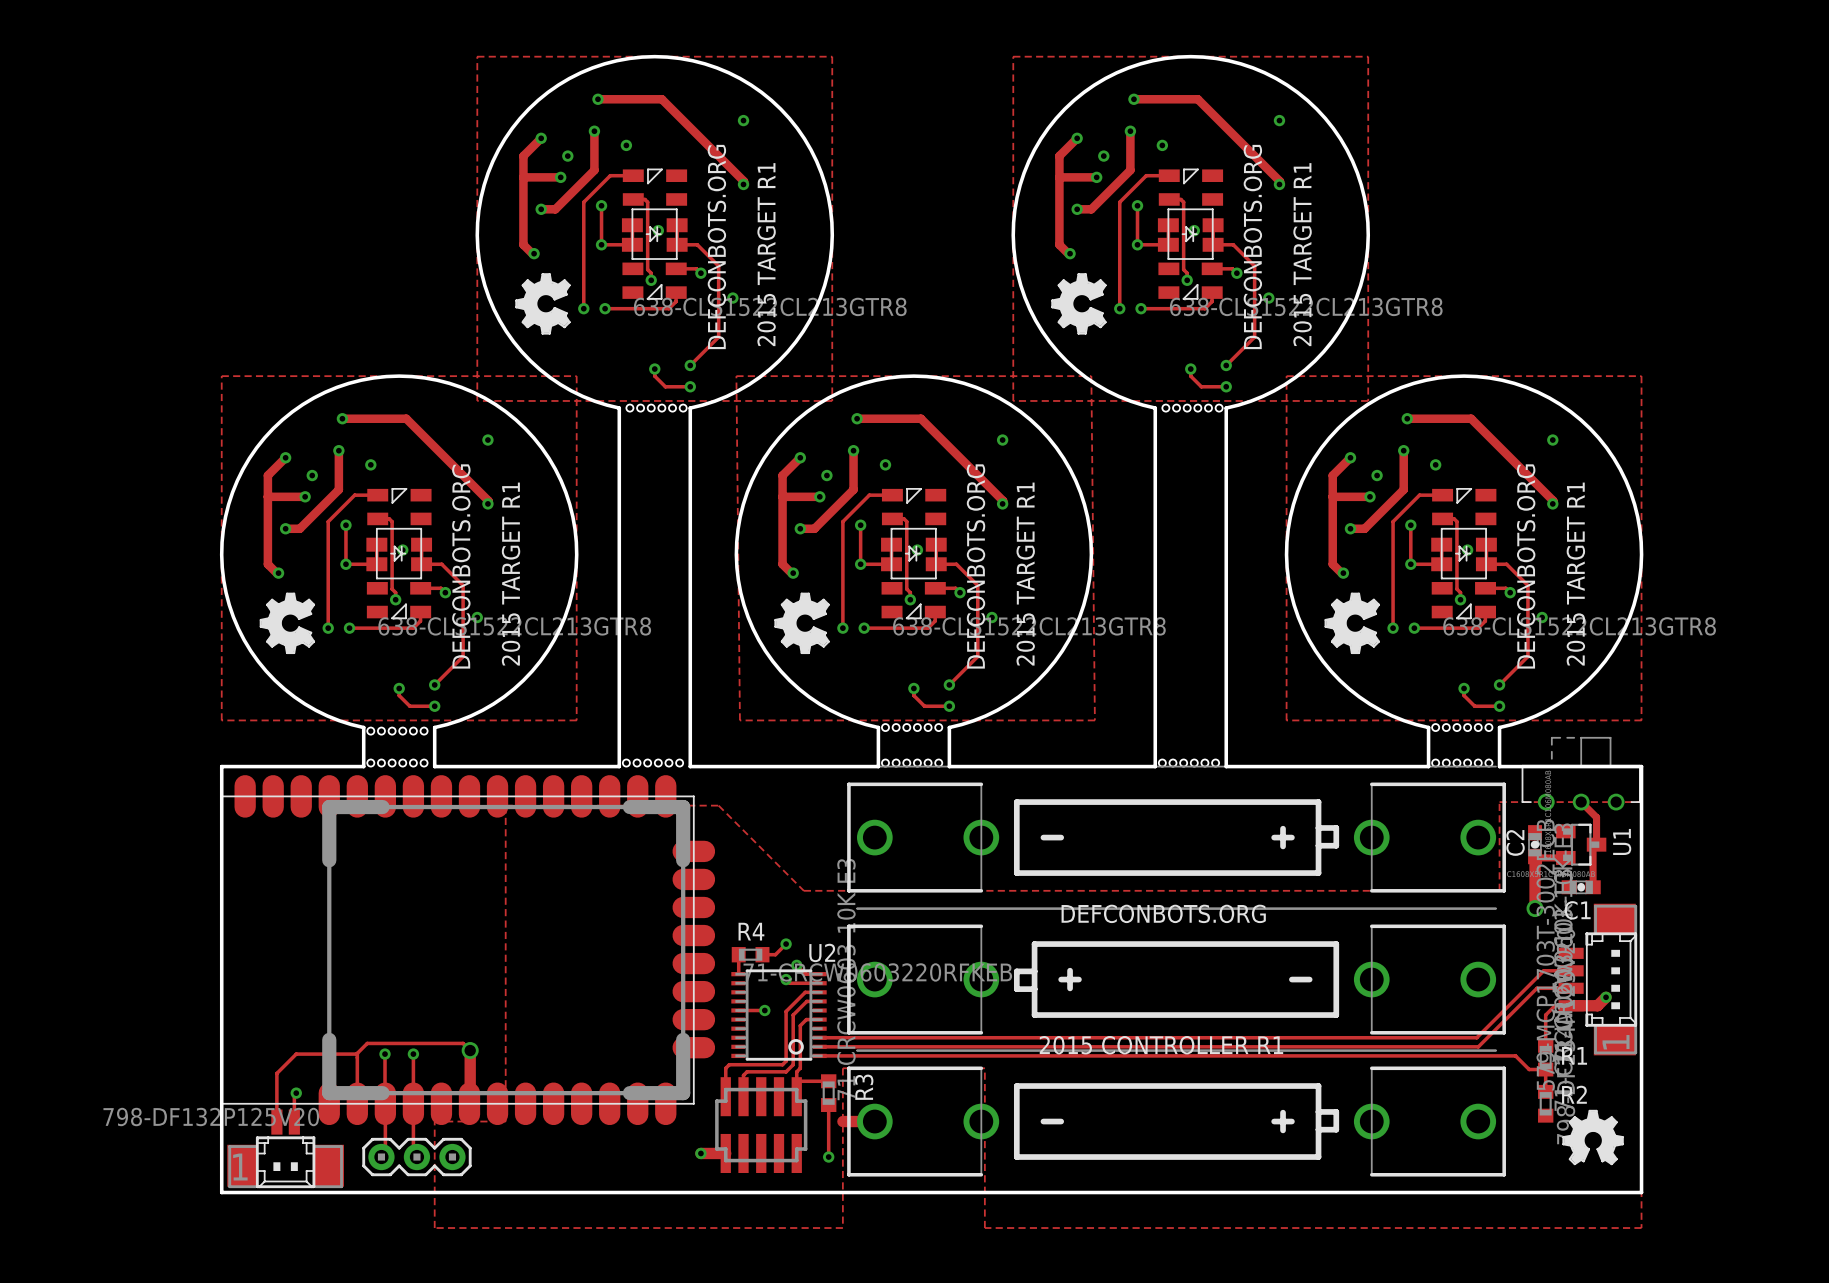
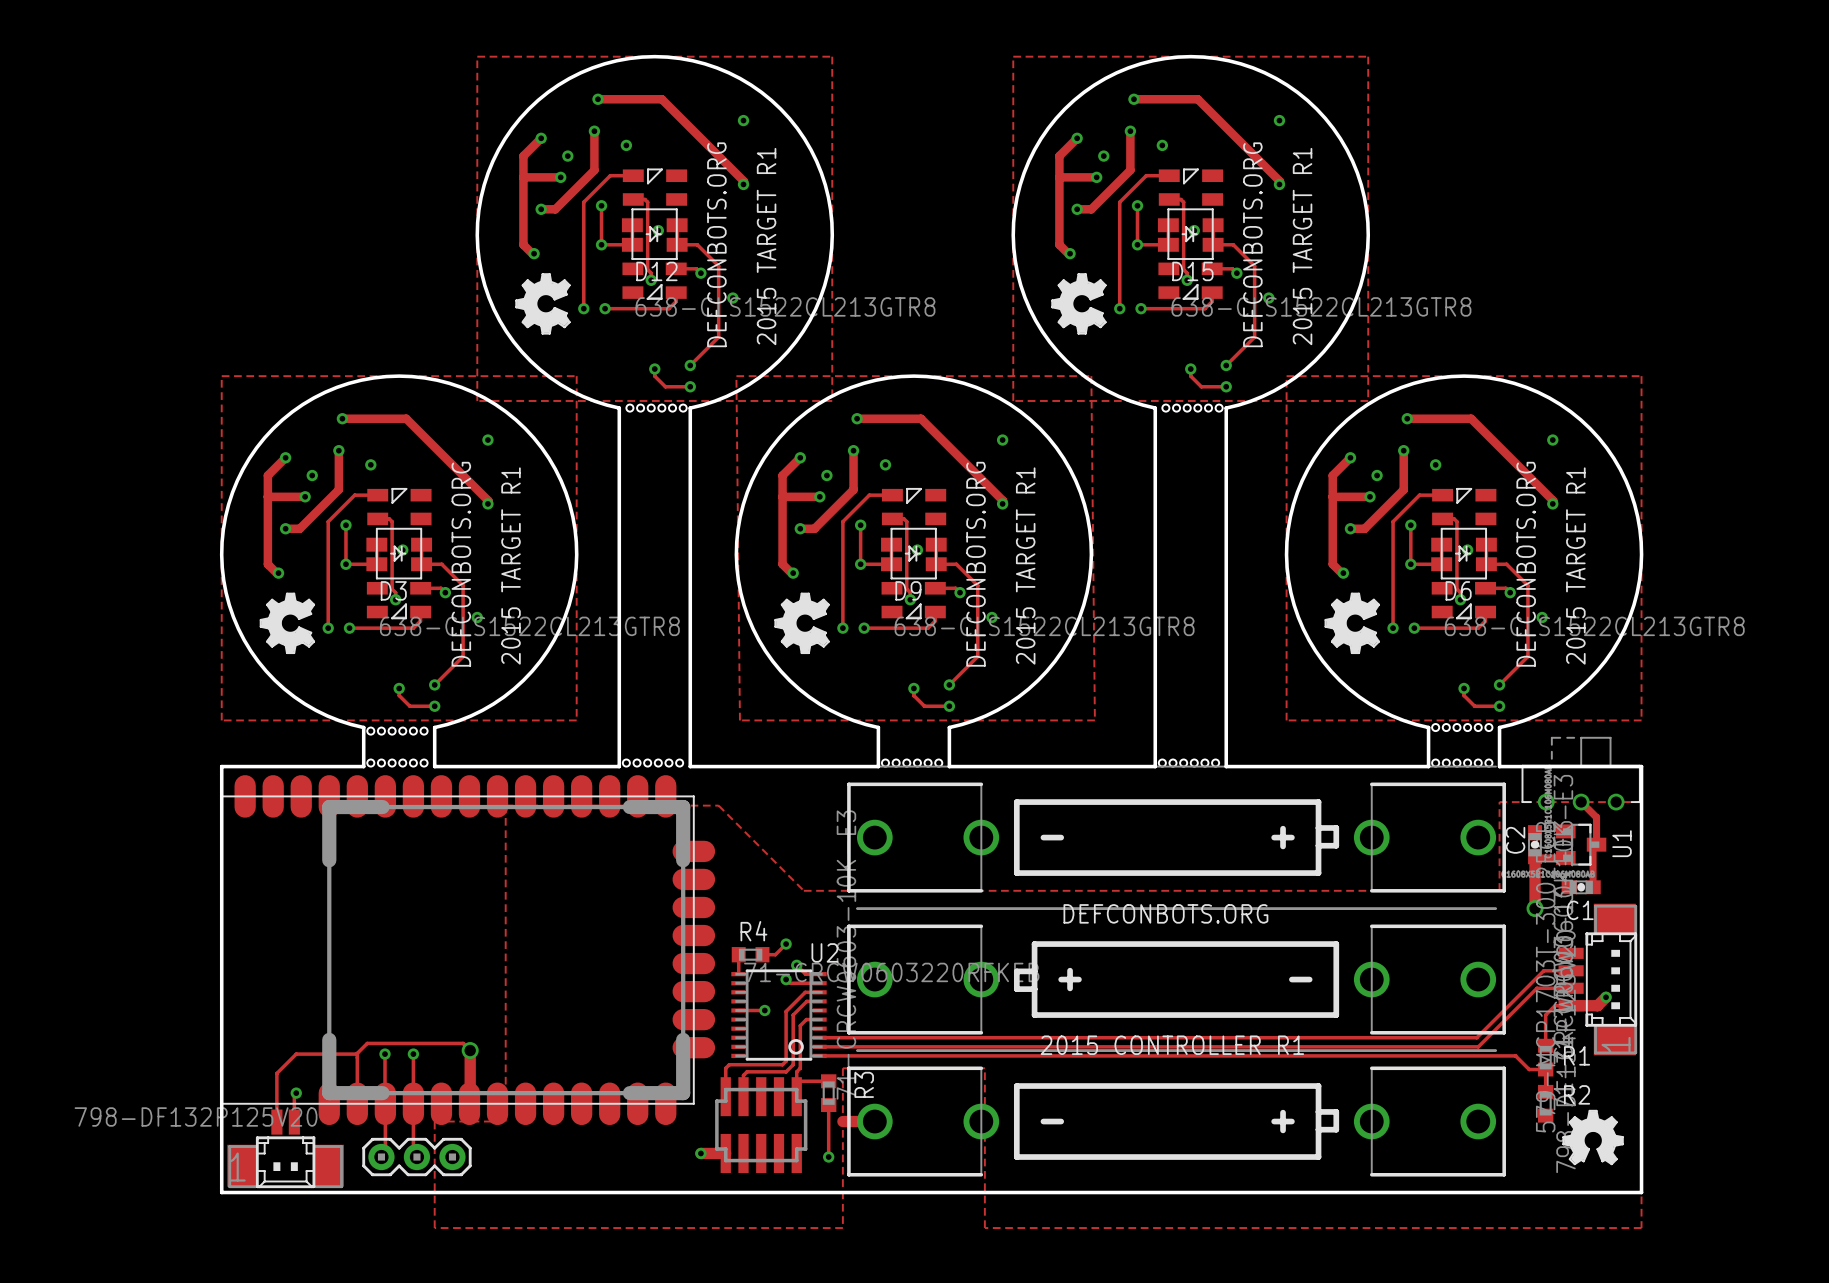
D12 name: none -> D12 (656, 271)
D15 name: none -> D15 (1192, 271)
D3 name: none -> D3 (393, 590)
D9 name: none -> D9 (908, 590)
D6 name: none -> D6 (1458, 590)
hole: (885, 727) -> none
hole: (896, 727) -> none
hole: (906, 727) -> none
hole: (917, 727) -> none
hole: (928, 727) -> none
hole: (938, 727) -> none

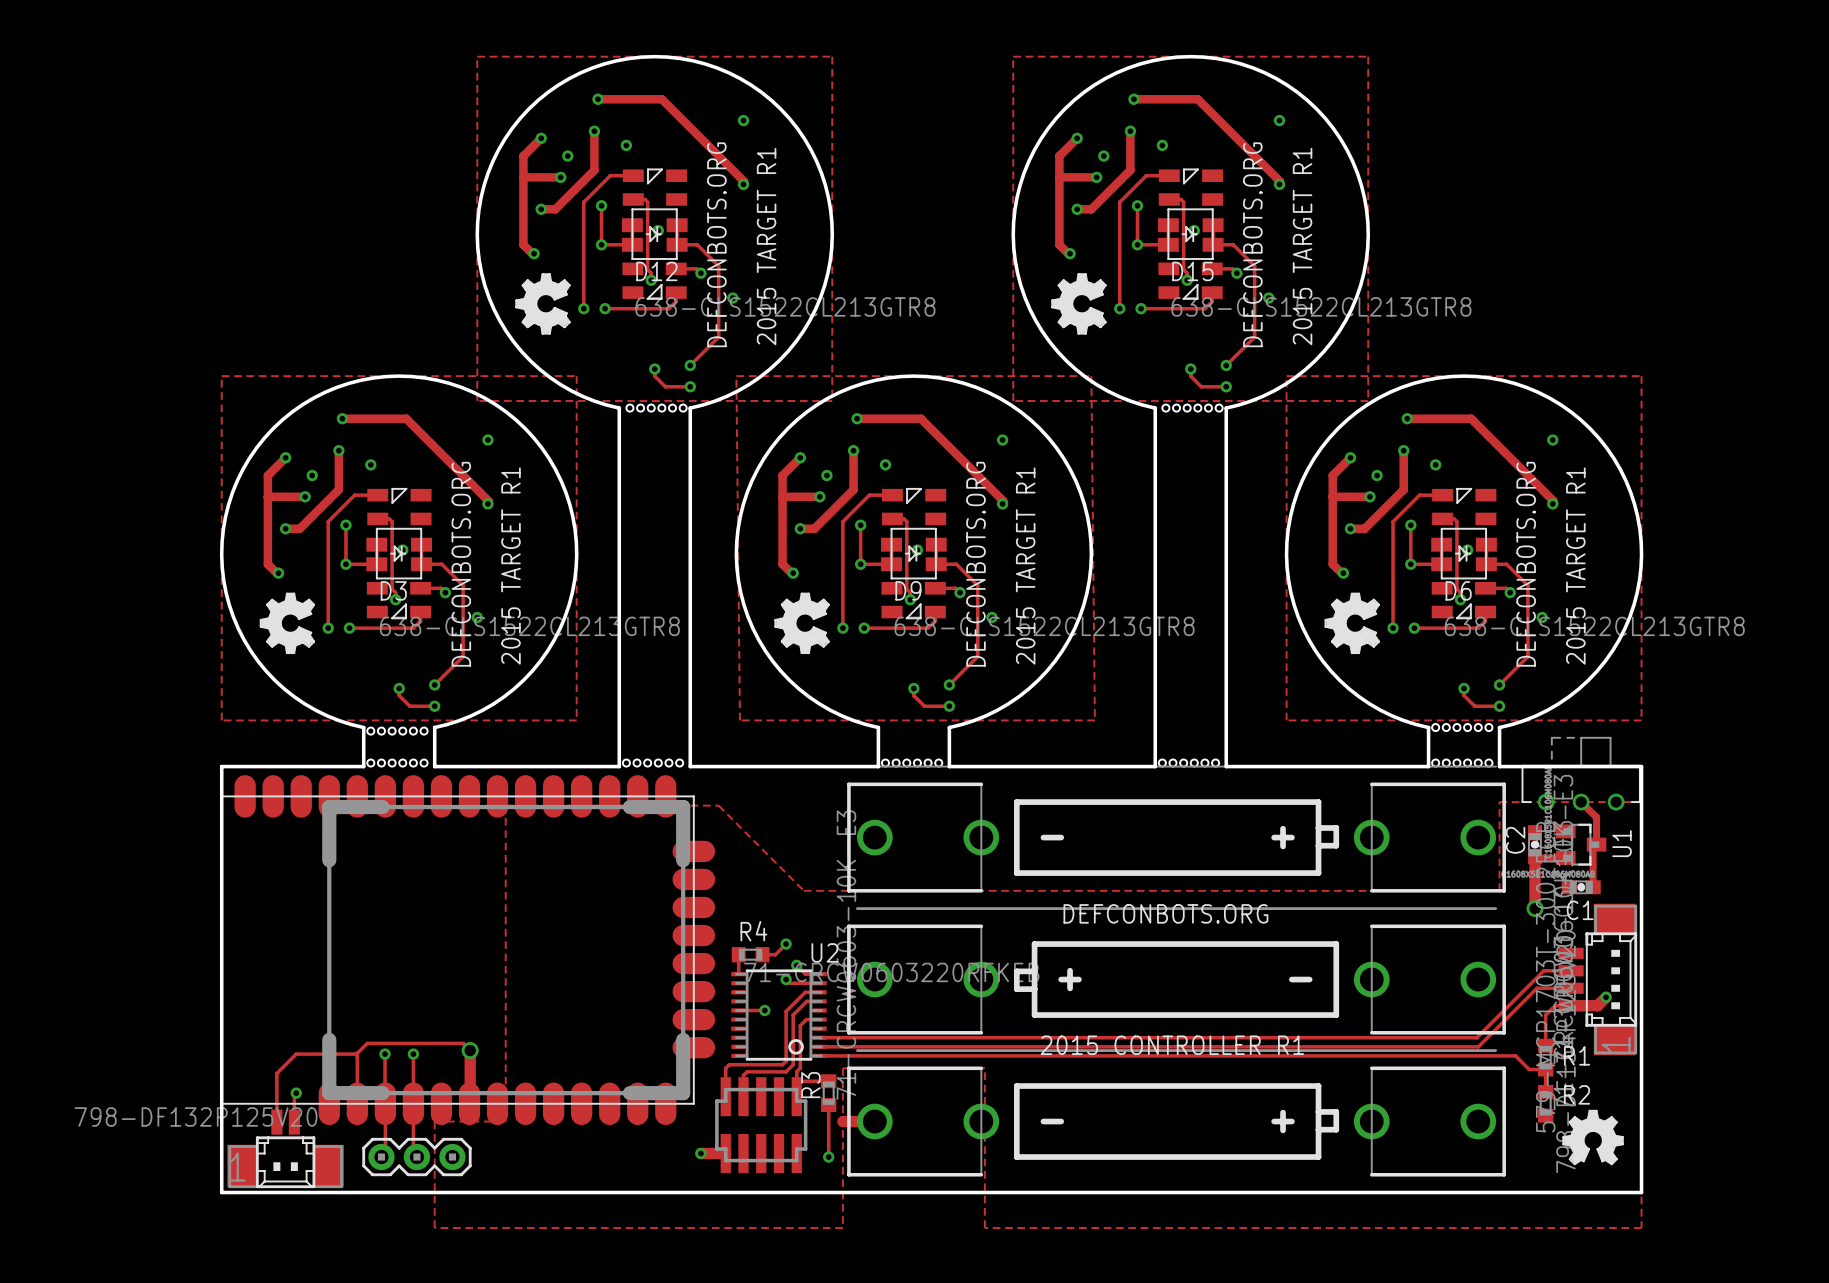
R3 name position: R3 (864, 1084) -> R3 (810, 1085)

